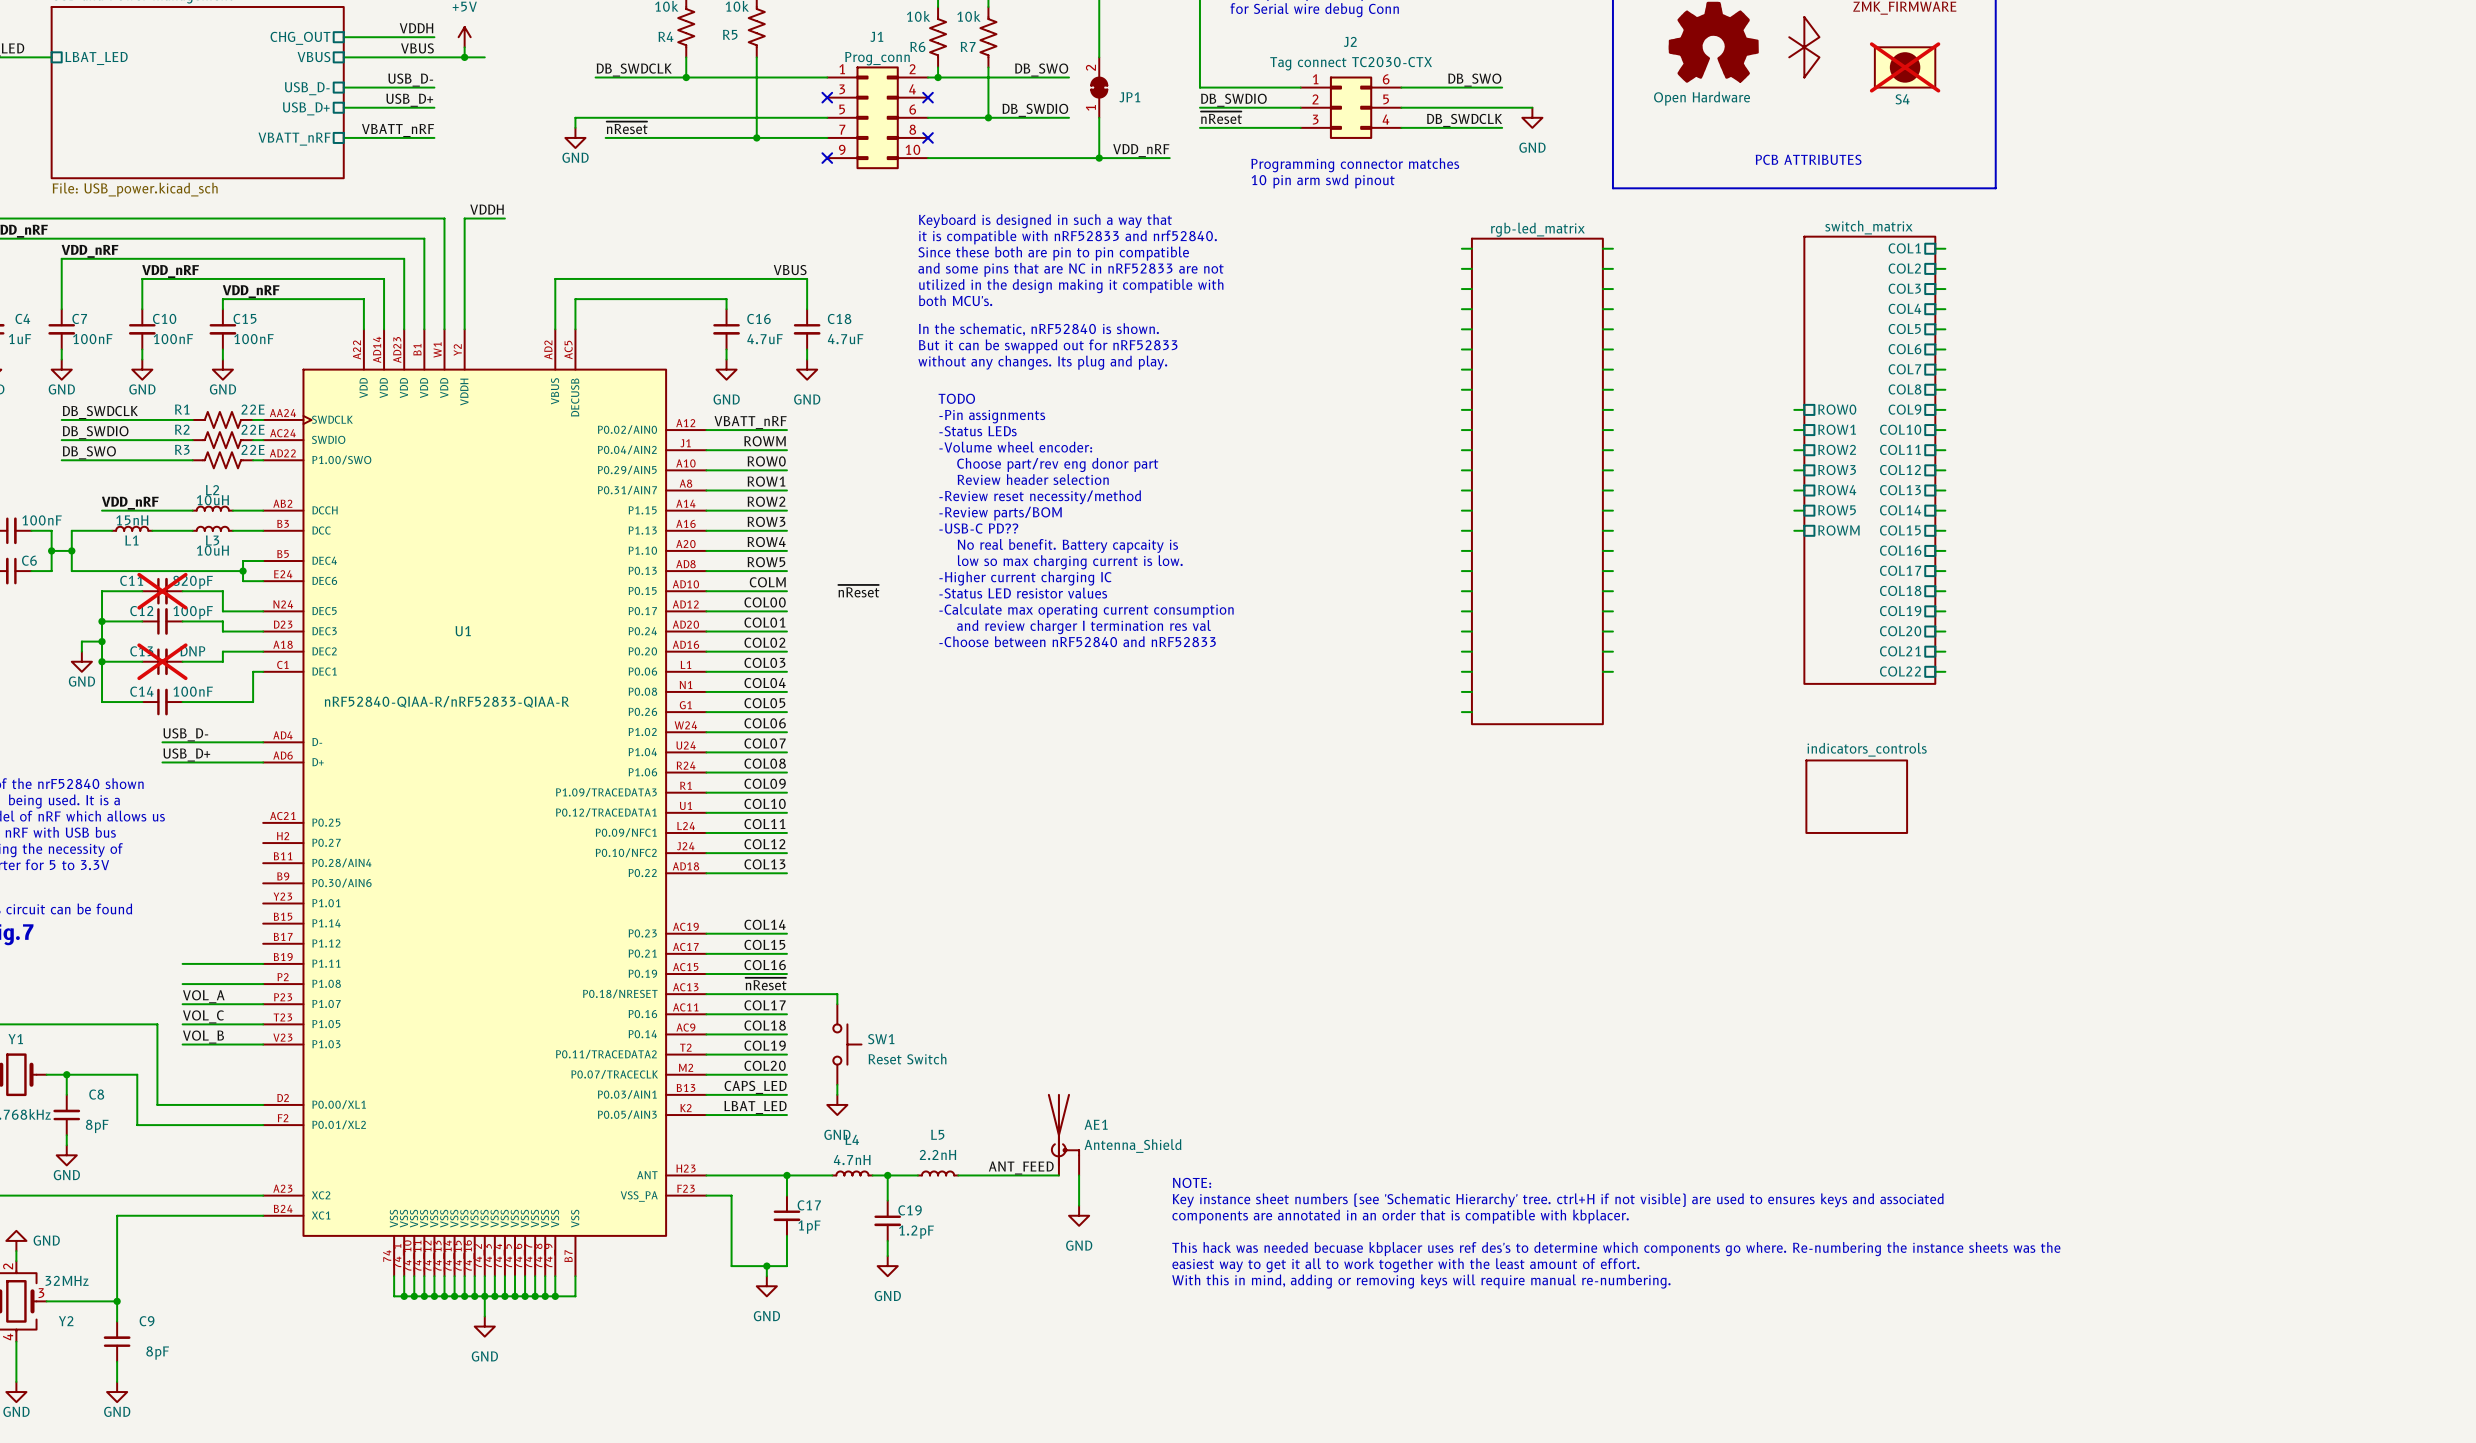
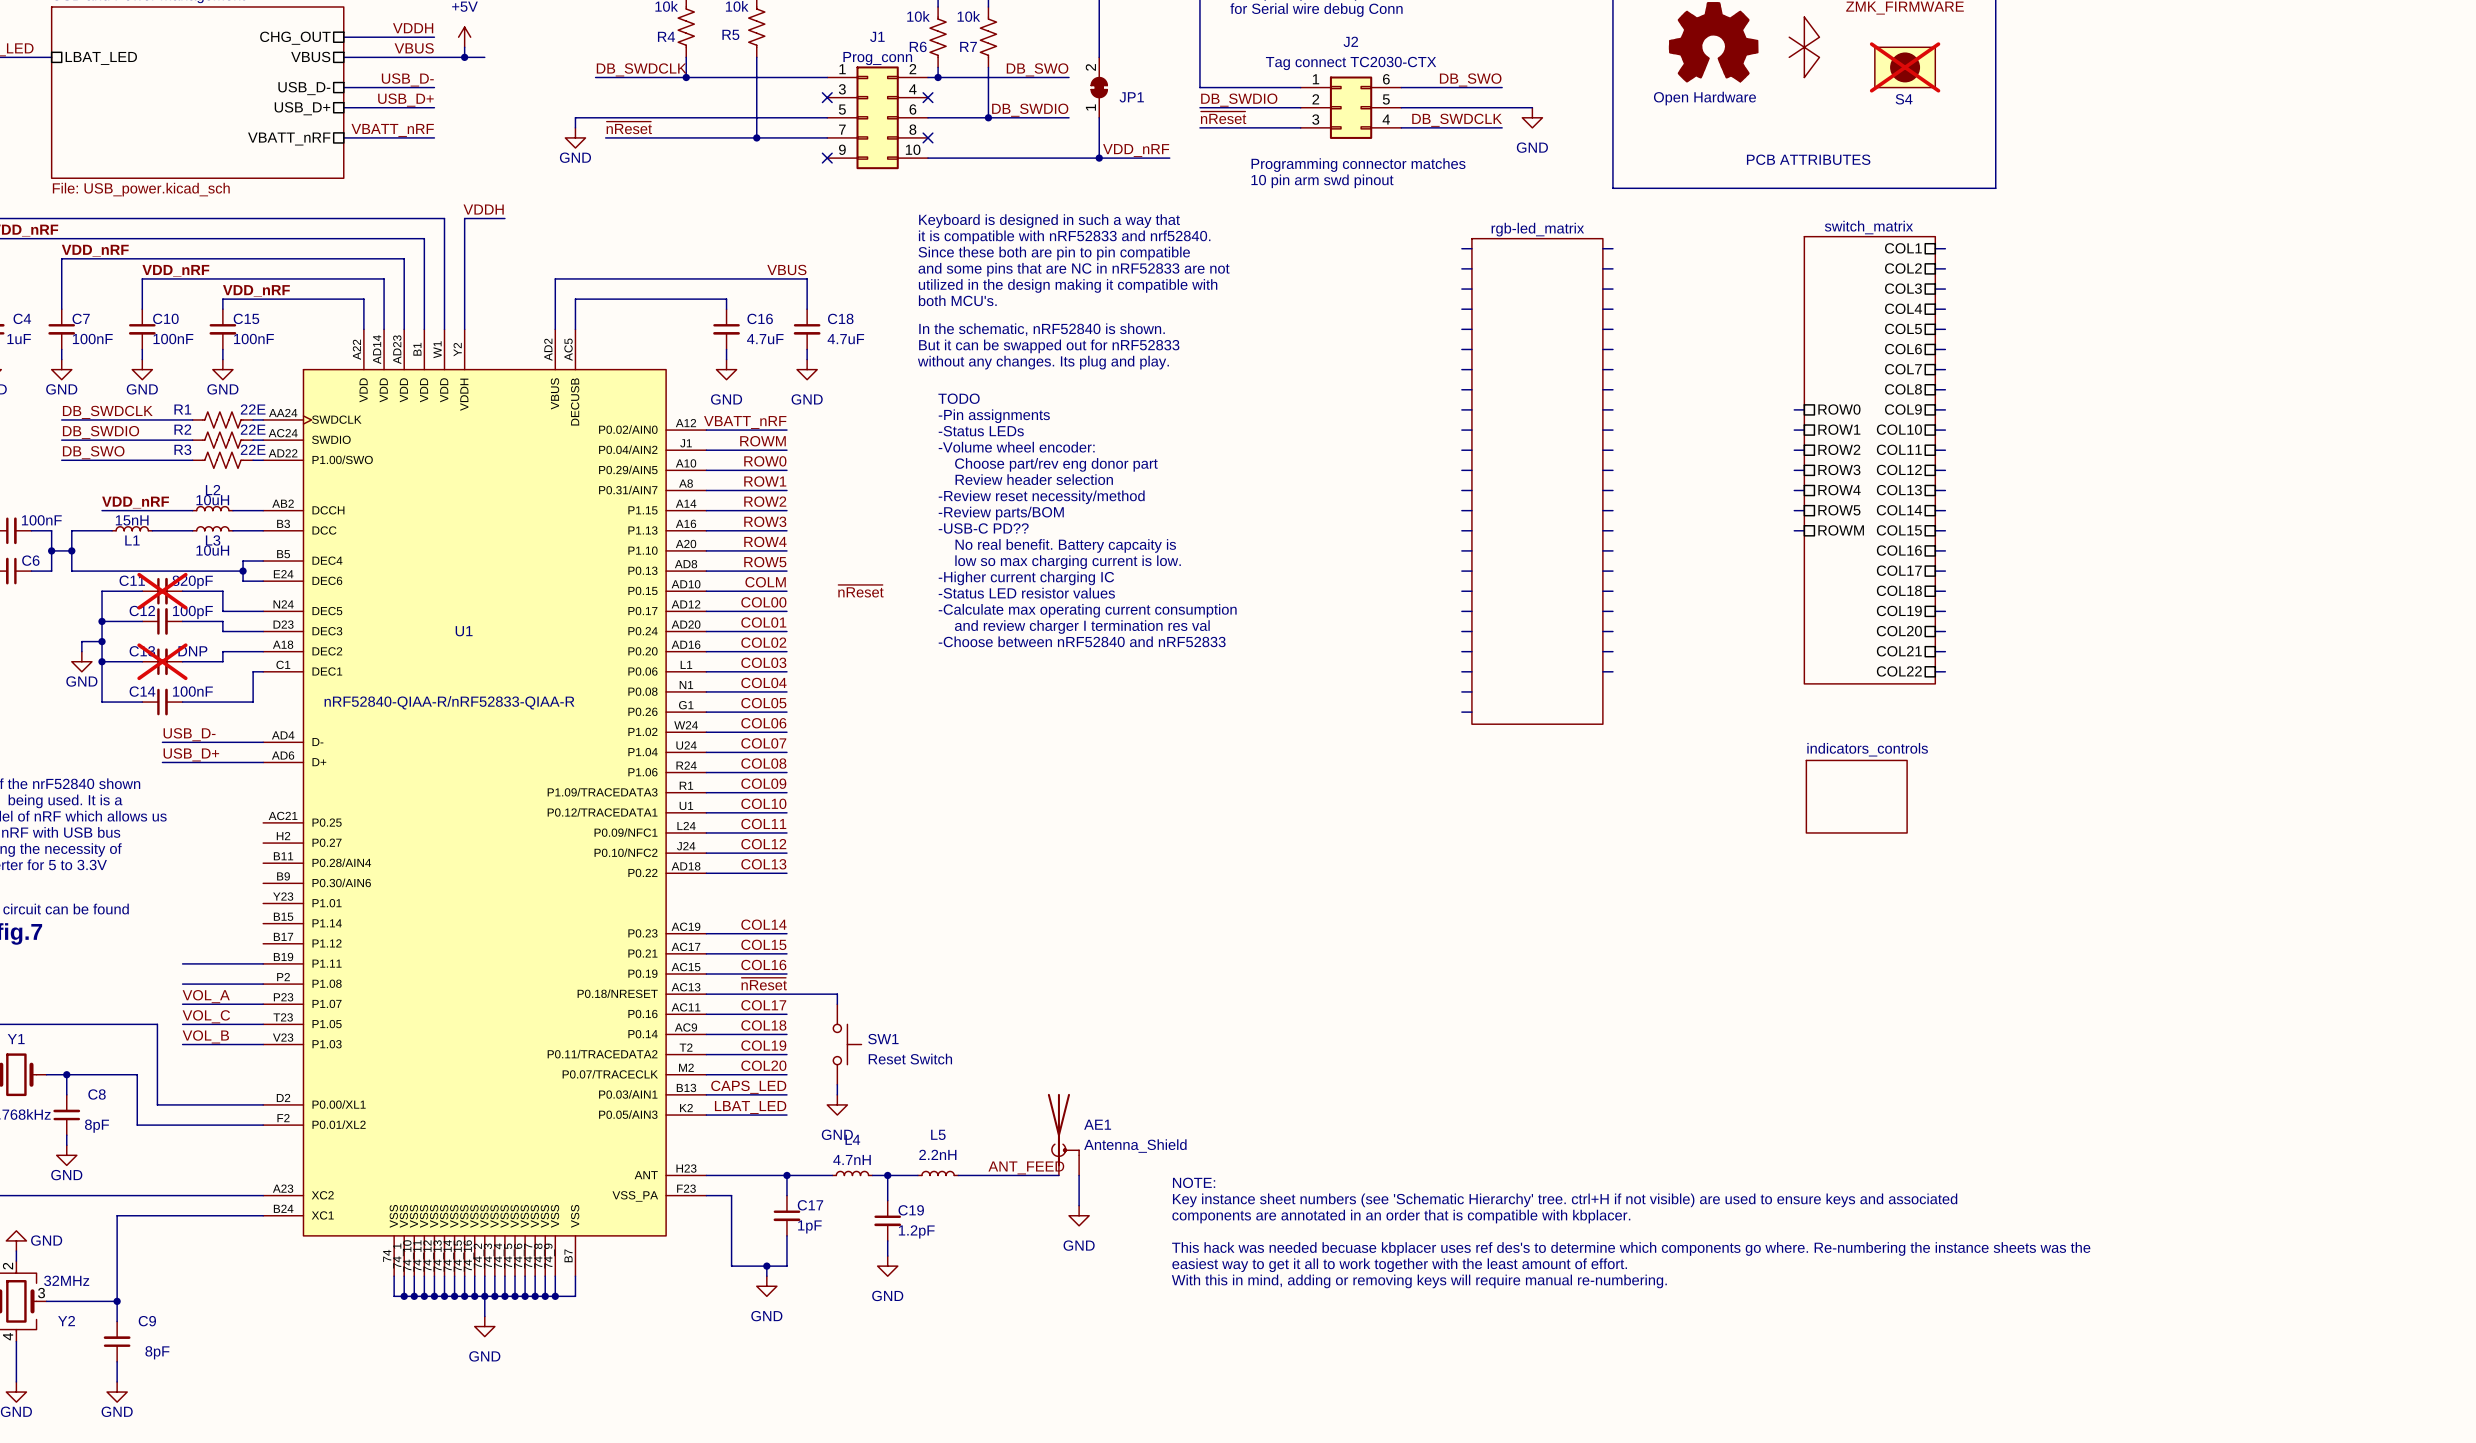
text: Key instance sheet numbers (see 'Schematic Hierarchy' tree. ctrl+H if not visible) are used to ensures keys and associated (1558, 1200) -> Key instance sheet numbers (see 'Schematic Hierarchy' tree. ctrl+H if not visible) are used to ensure keys and associated (1565, 1200)

